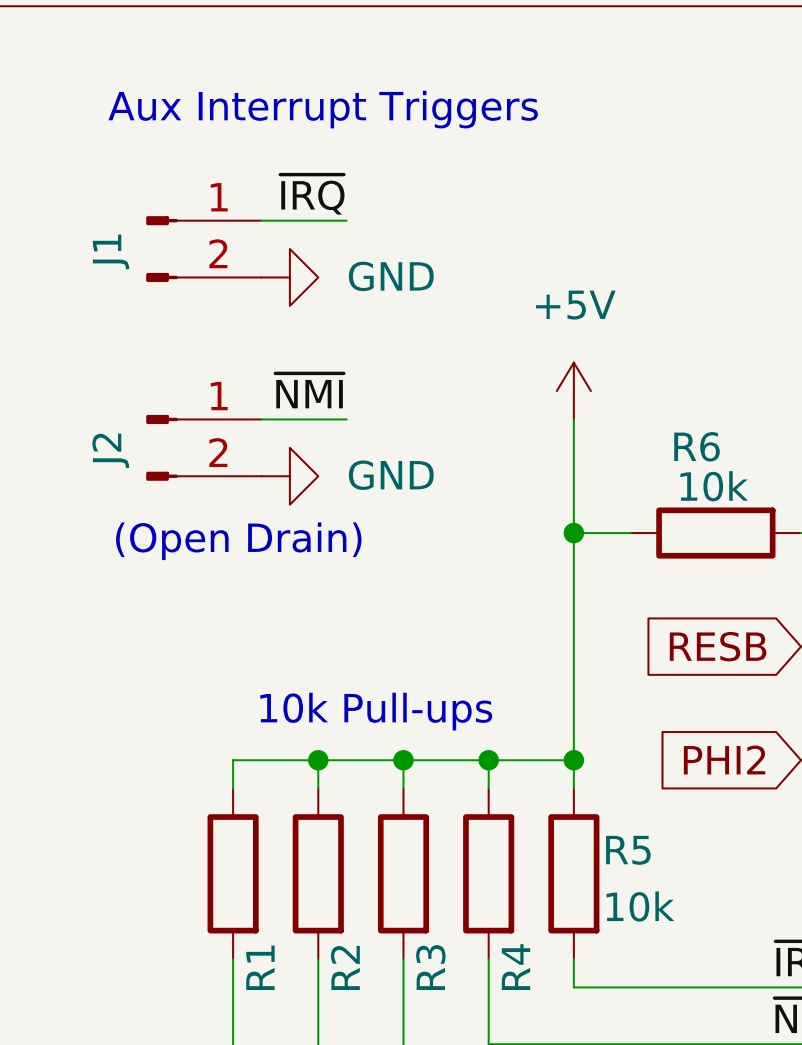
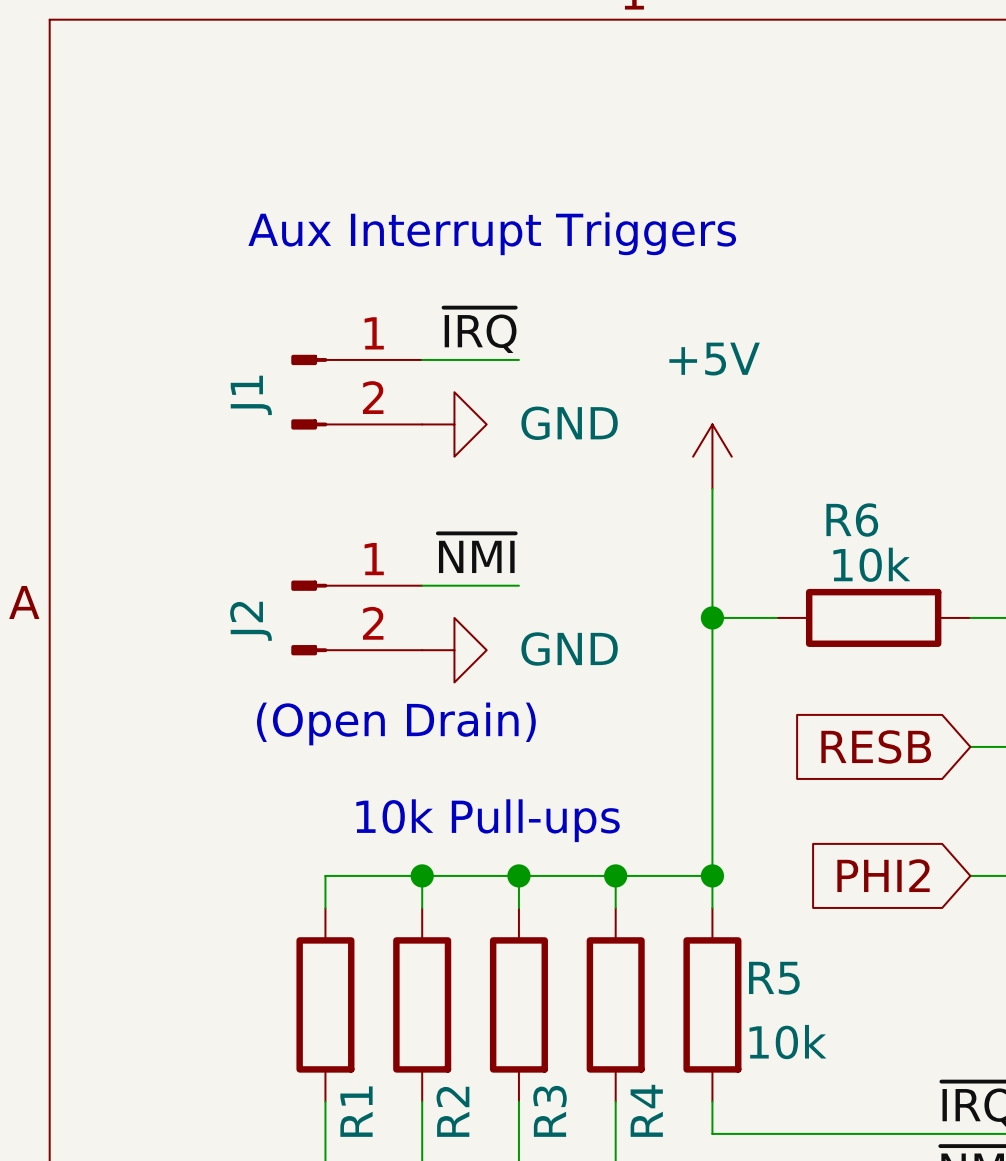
text position: Aux Interrupt Triggers (323, 109) -> Aux Interrupt Triggers (492, 233)
label position: ~{IRQ} (312, 194) -> ~{IRQ} (480, 330)
wire: (261, 220) (346, 220) -> (422, 359) (518, 359)
J1 position: (203, 249) -> (356, 392)
power symbol: GND (289, 277) -> none
power symbol: none -> GND (454, 424)
label position: ~{NMI} (309, 390) -> ~{NMI} (476, 553)
wire: (261, 419) (346, 419) -> (422, 585) (518, 585)
J2 position: (203, 447) -> (356, 617)
power symbol: GND (289, 476) -> none
text position: (Open Drain) (238, 541) -> (Open Drain) (396, 723)
power symbol: none -> GND (454, 650)

